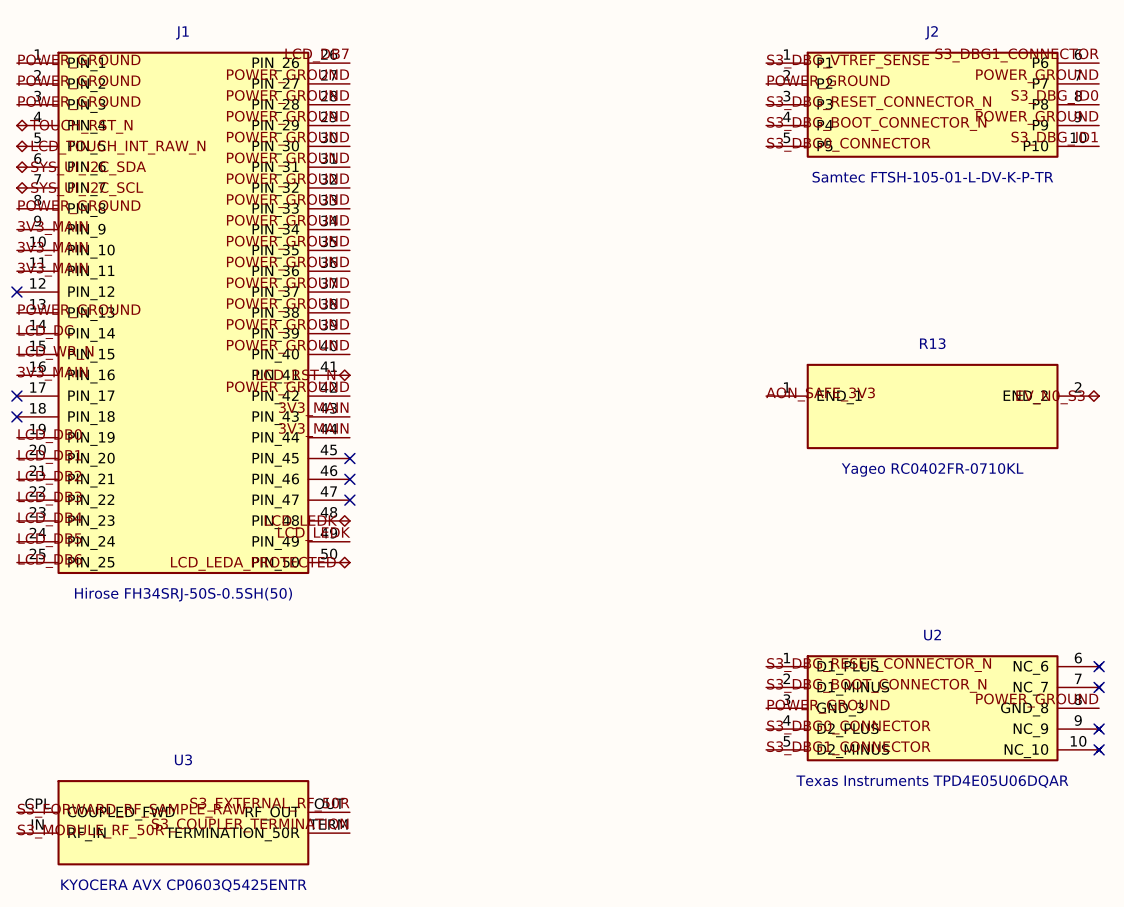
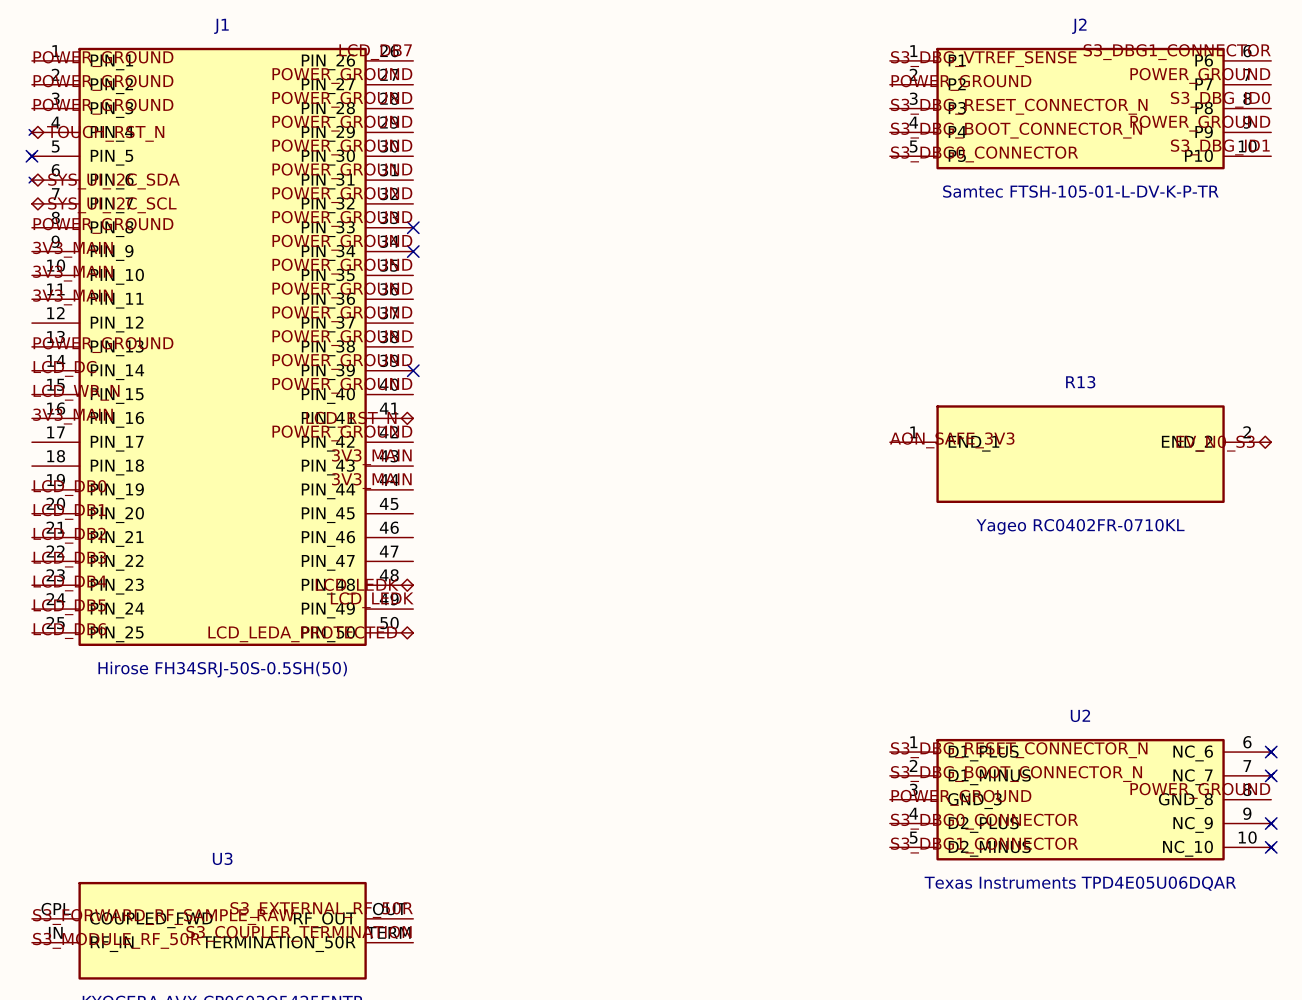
J1 symbol: [16, 51, 350, 575] -> [29, 47, 414, 646]
no-connect mark: none -> (31, 156)
hierarchical label: LCD_TOUCH_INT_RAW_N (118, 147) -> none
no-connect mark: none -> (413, 227)
no-connect mark: none -> (413, 251)
no-connect mark: (16, 292) -> none
no-connect mark: none -> (413, 370)
no-connect mark: (16, 396) -> none
no-connect mark: (16, 416) -> none
no-connect mark: (349, 458) -> none
no-connect mark: (349, 479) -> none
no-connect mark: (349, 500) -> none

